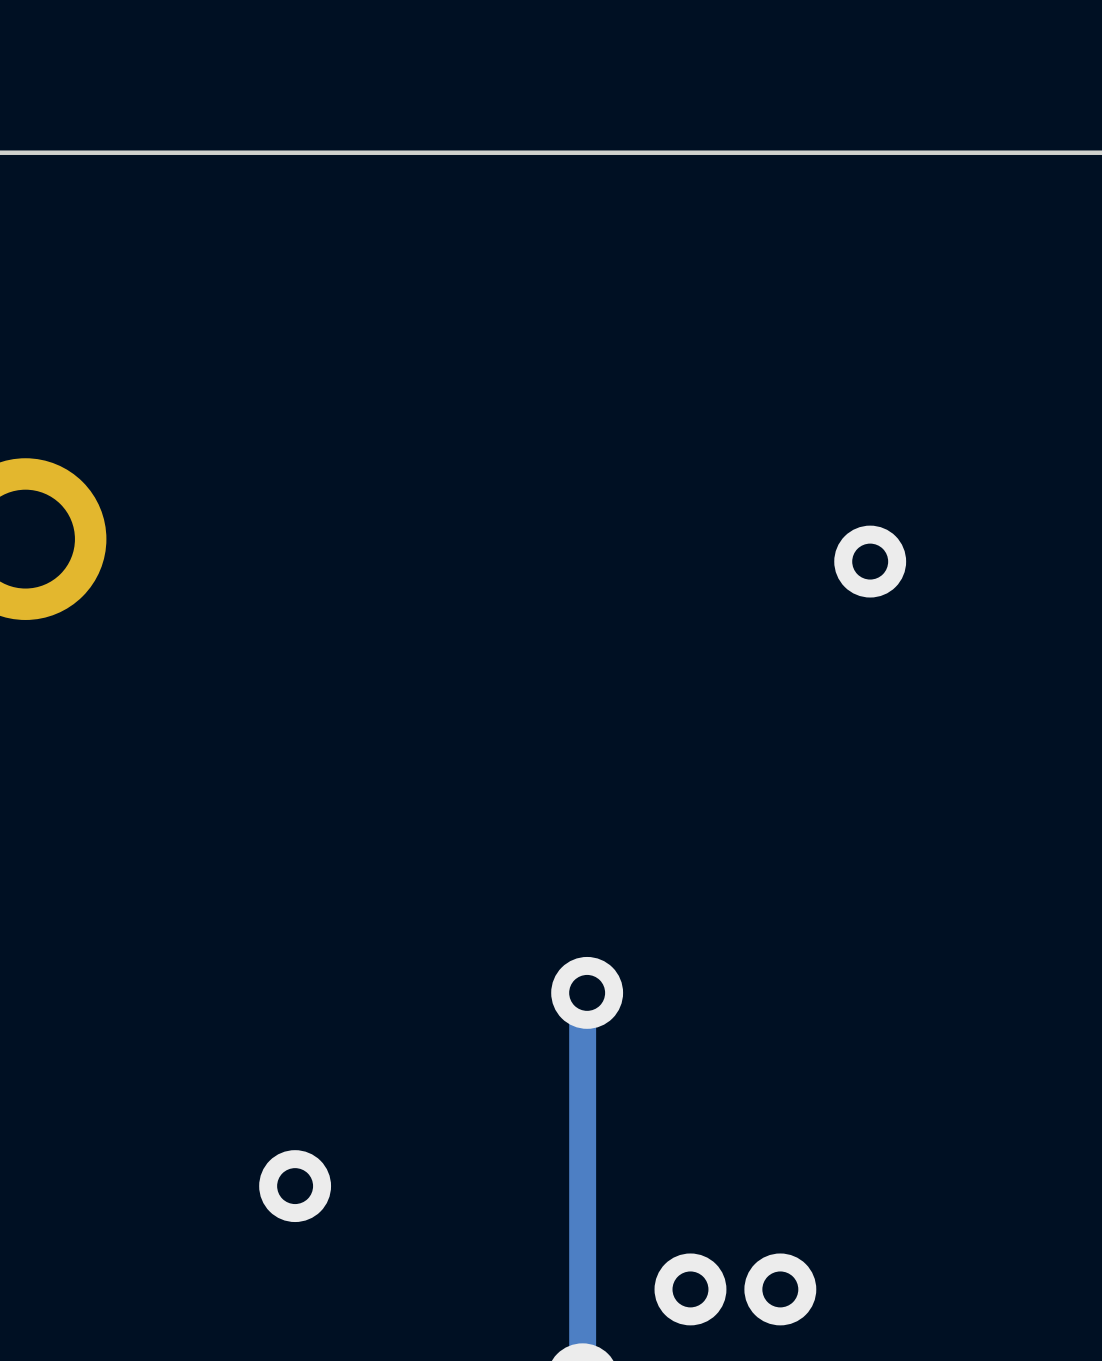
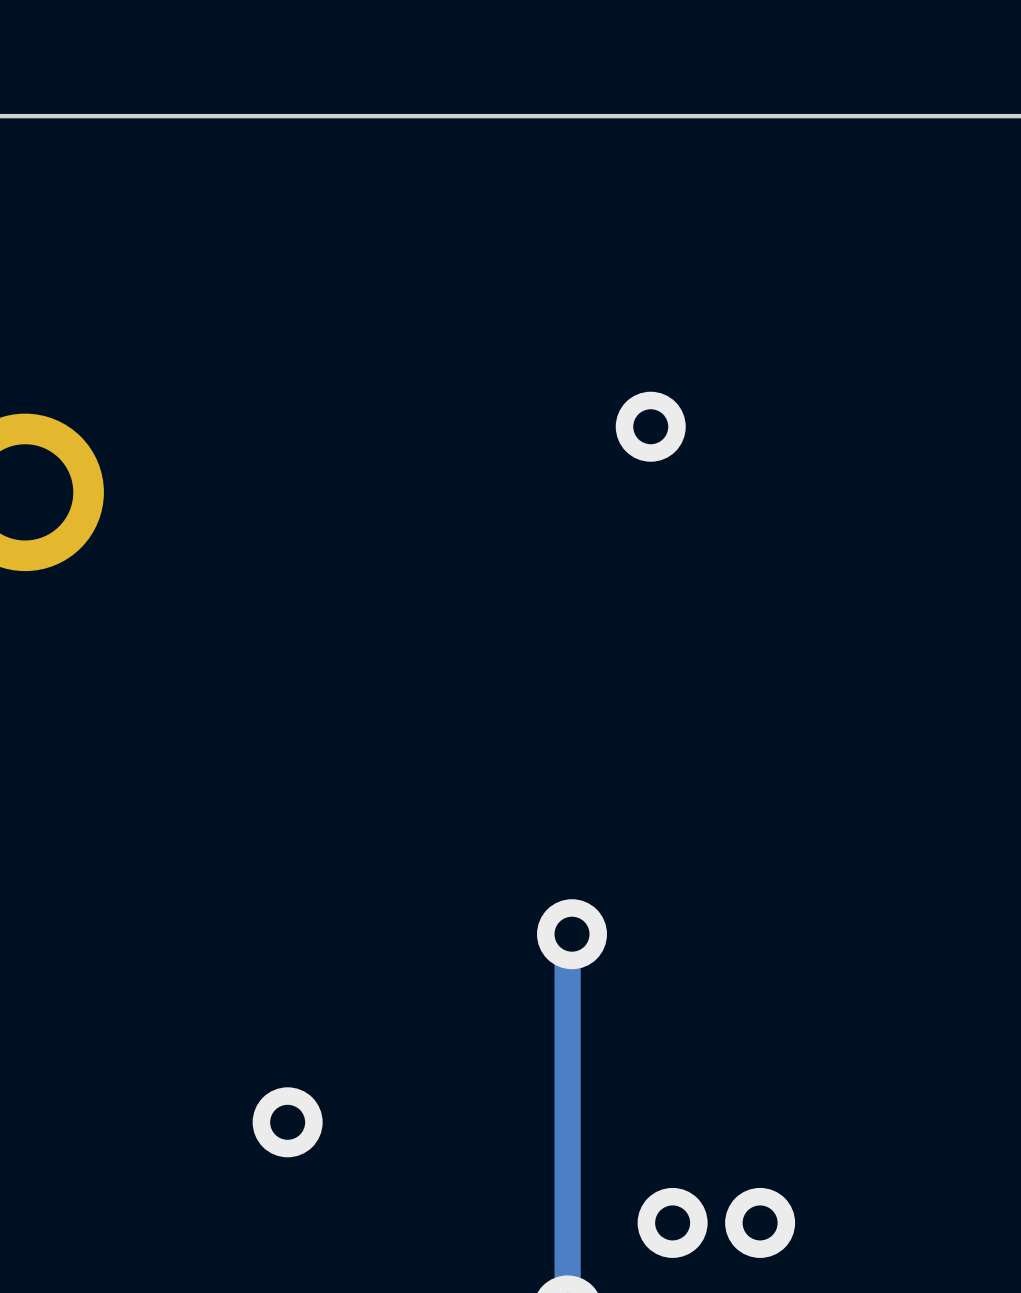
via position: (870, 561) -> (650, 426)

